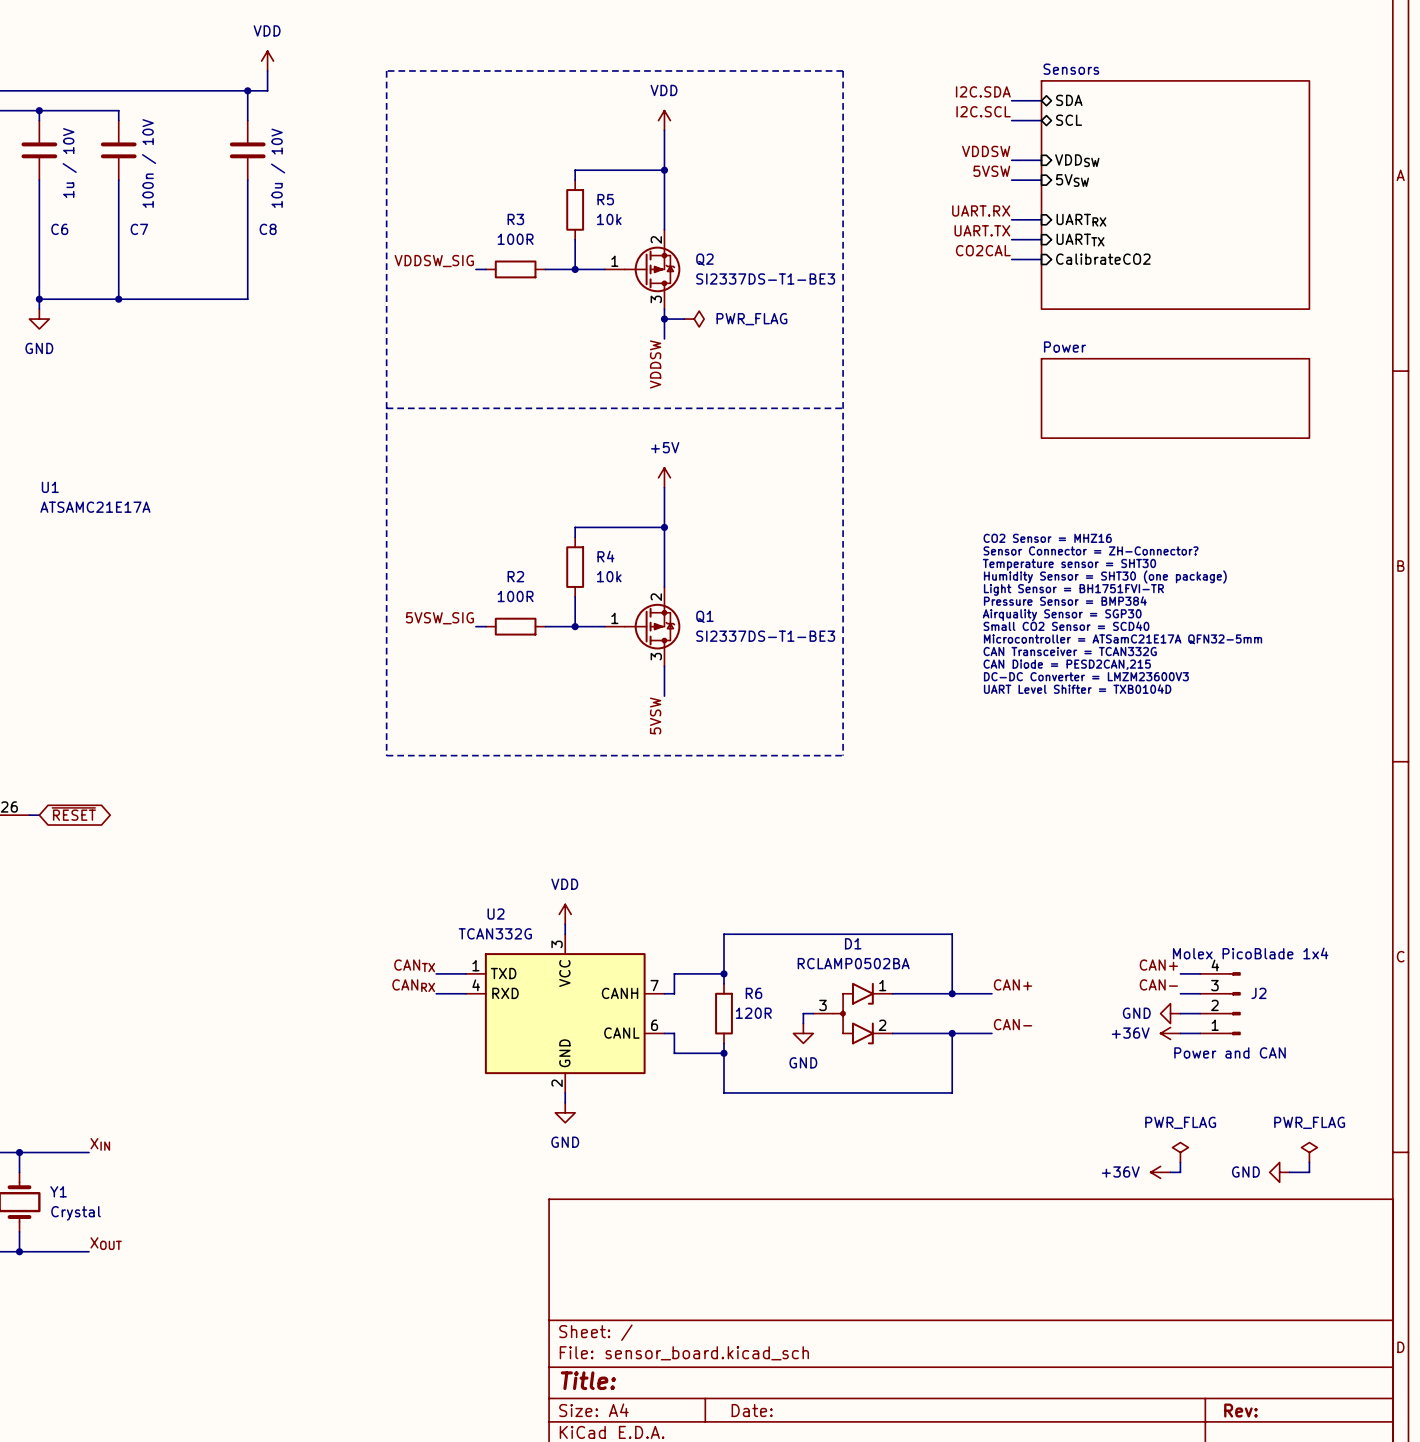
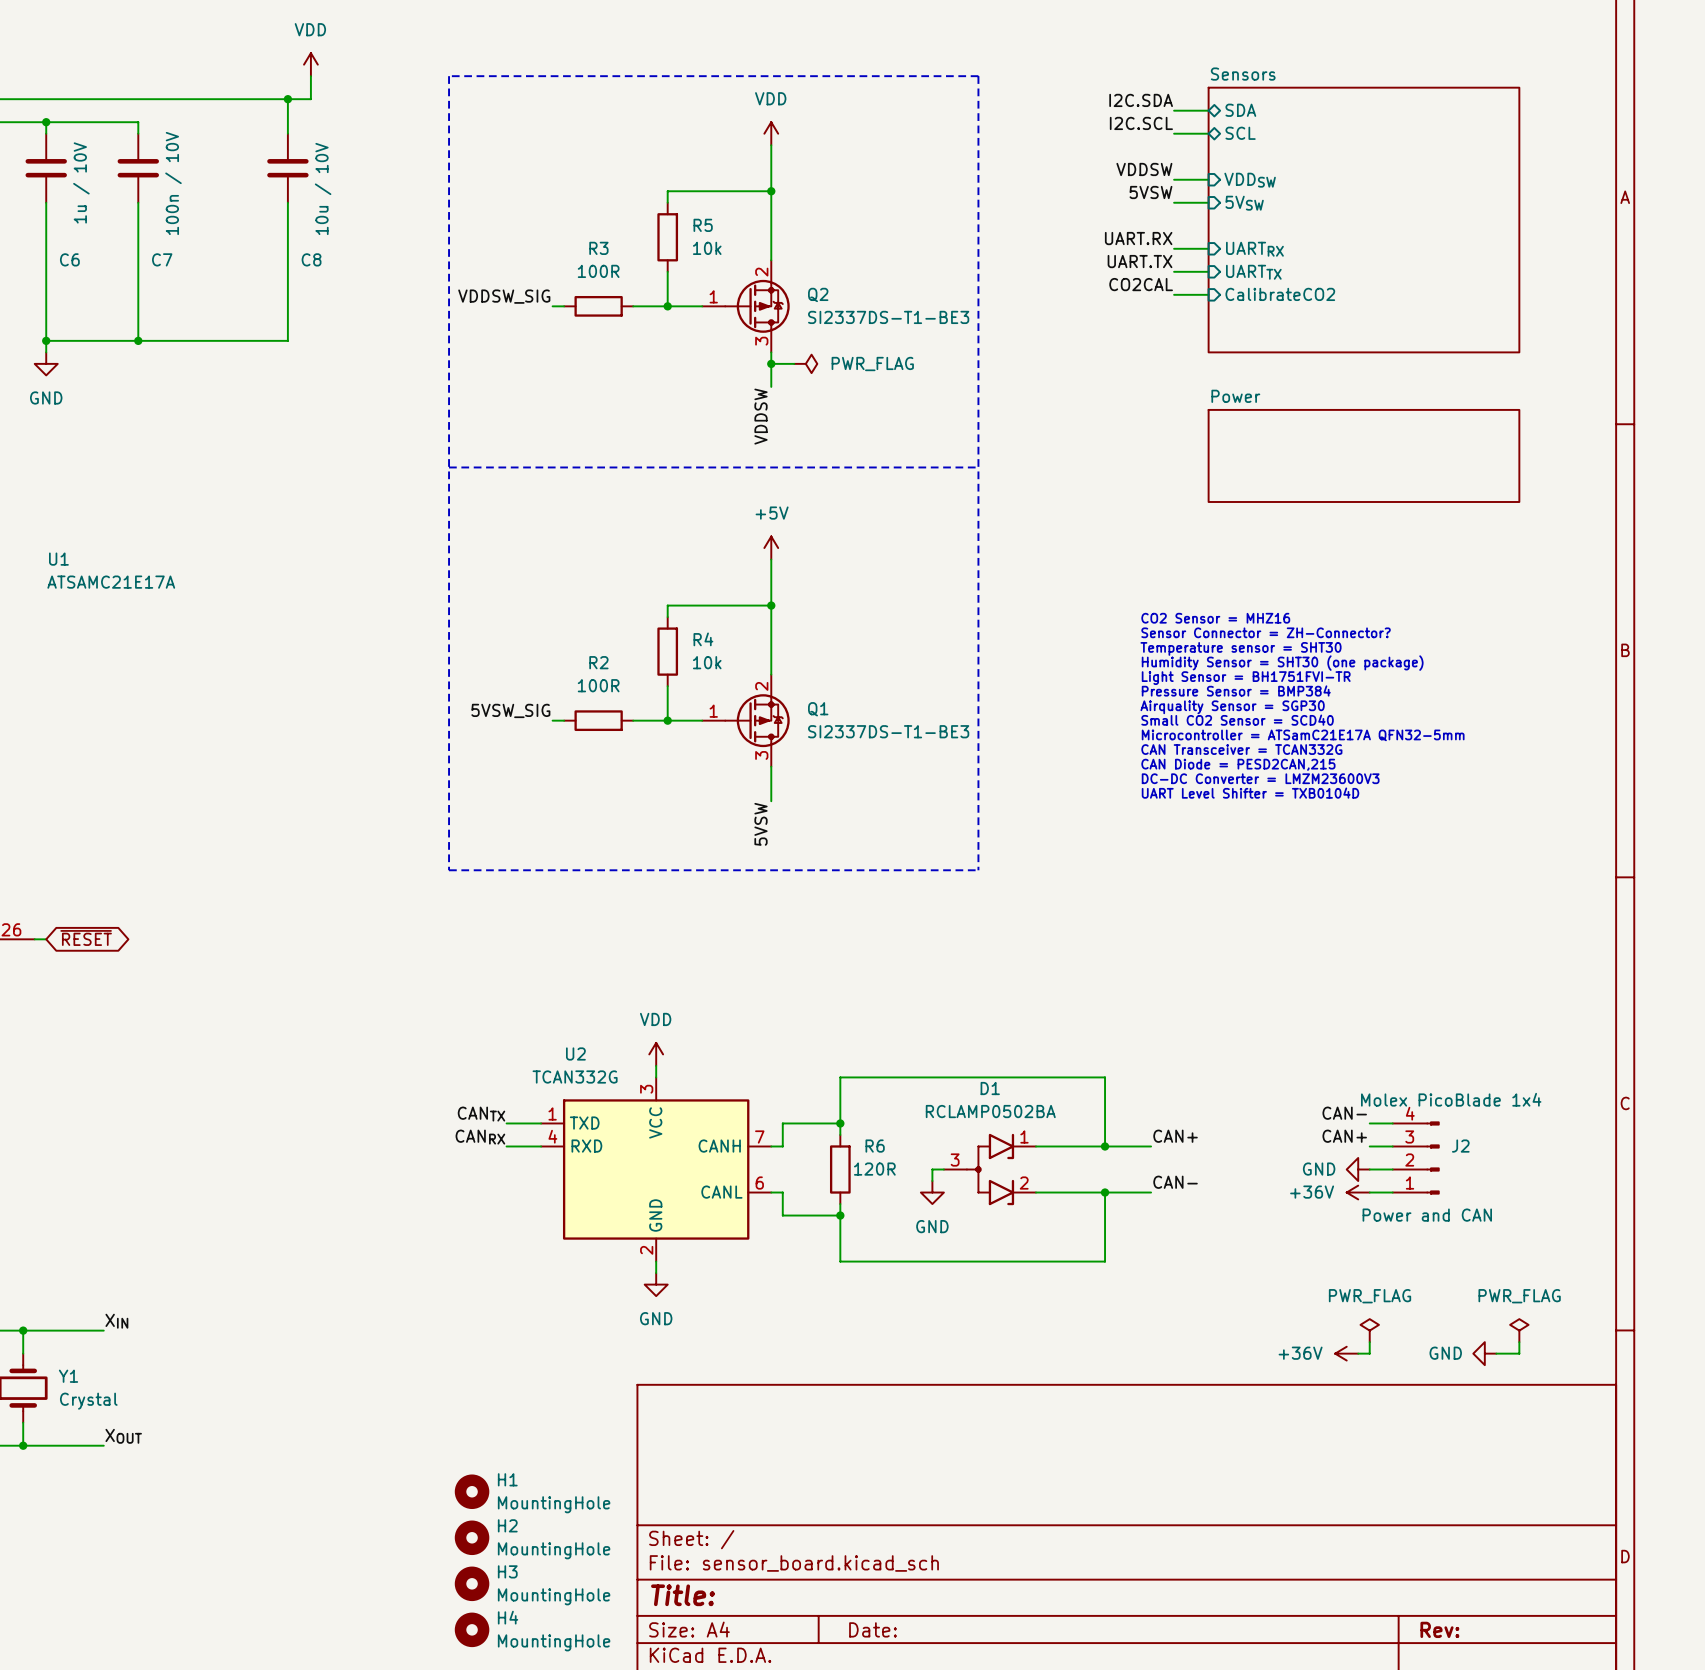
label: CAN+ (1158, 965) -> CAN- (1344, 1113)
label: CAN- (1158, 984) -> CAN+ (1344, 1136)
H1: none -> MountingHole (472, 1491)
H2: none -> MountingHole (472, 1537)
H3: none -> MountingHole (472, 1583)
H4: none -> MountingHole (472, 1629)

